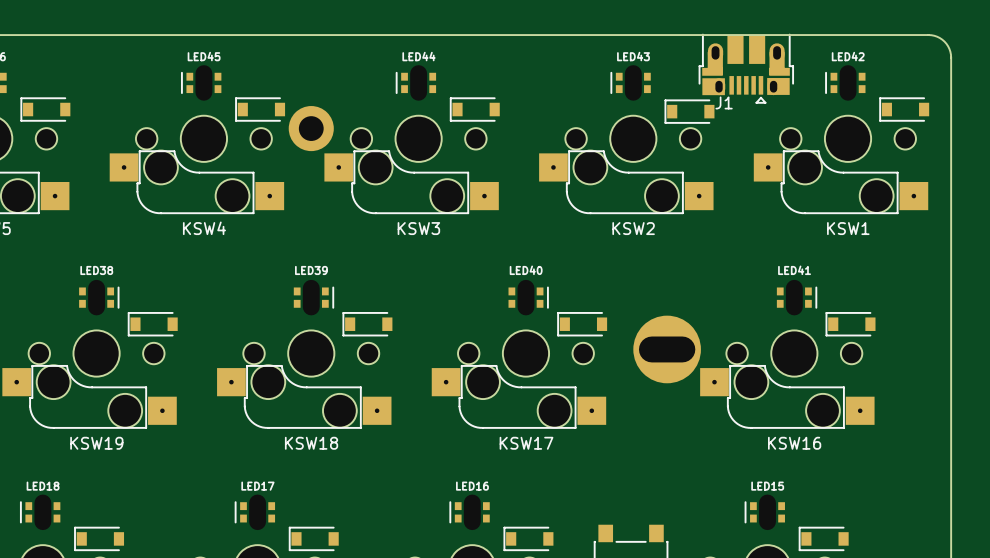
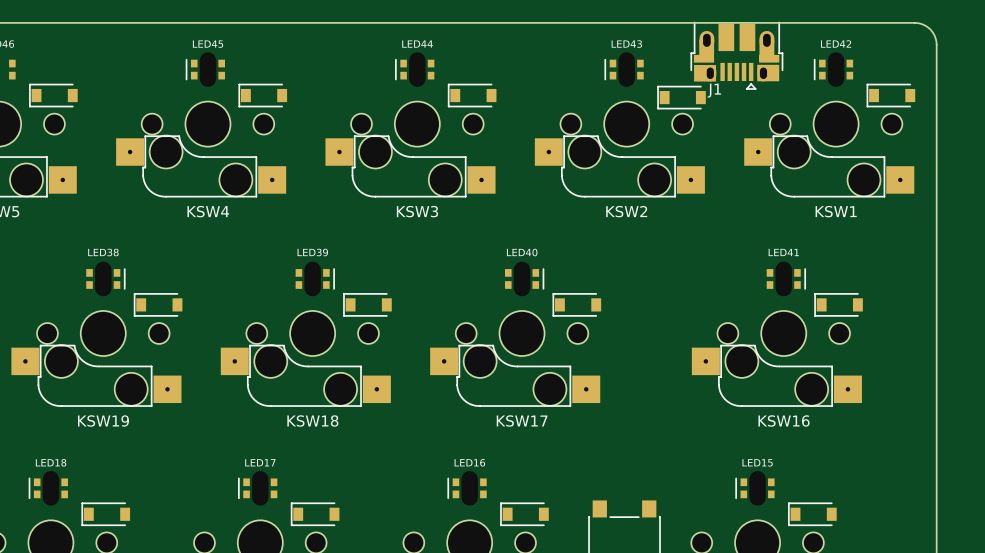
part: (311, 128) -> none
part: (667, 349) -> none

